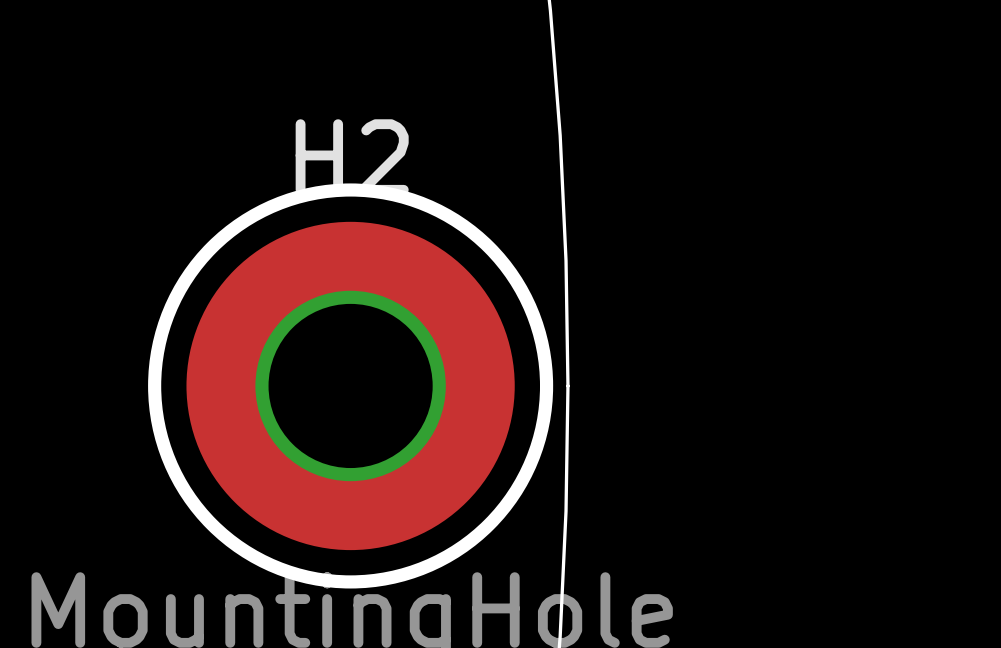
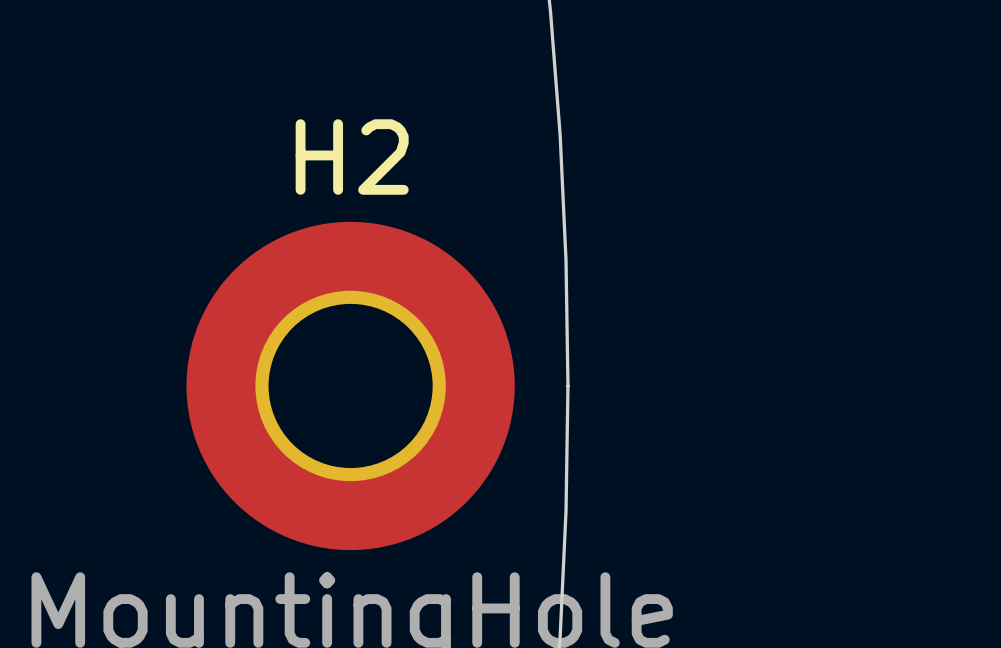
round board edge: [148, 183, 554, 589] -> none

